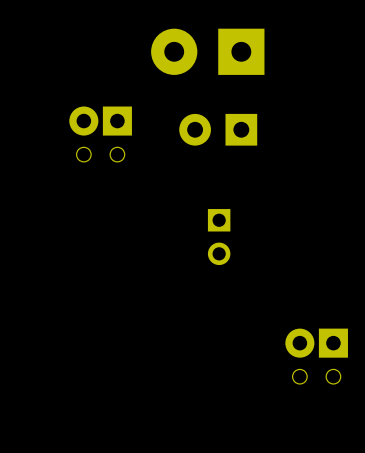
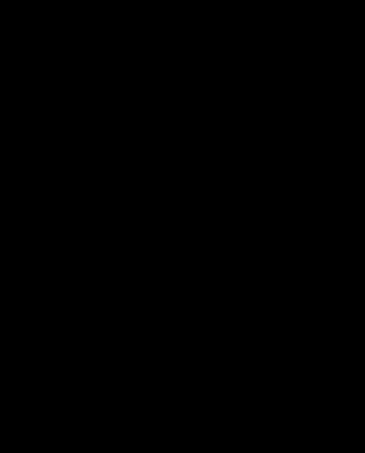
part: (207, 51) -> none
part: (218, 129) -> none
part: (100, 134) -> none
part: (219, 237) -> none
part: (316, 356) -> none

